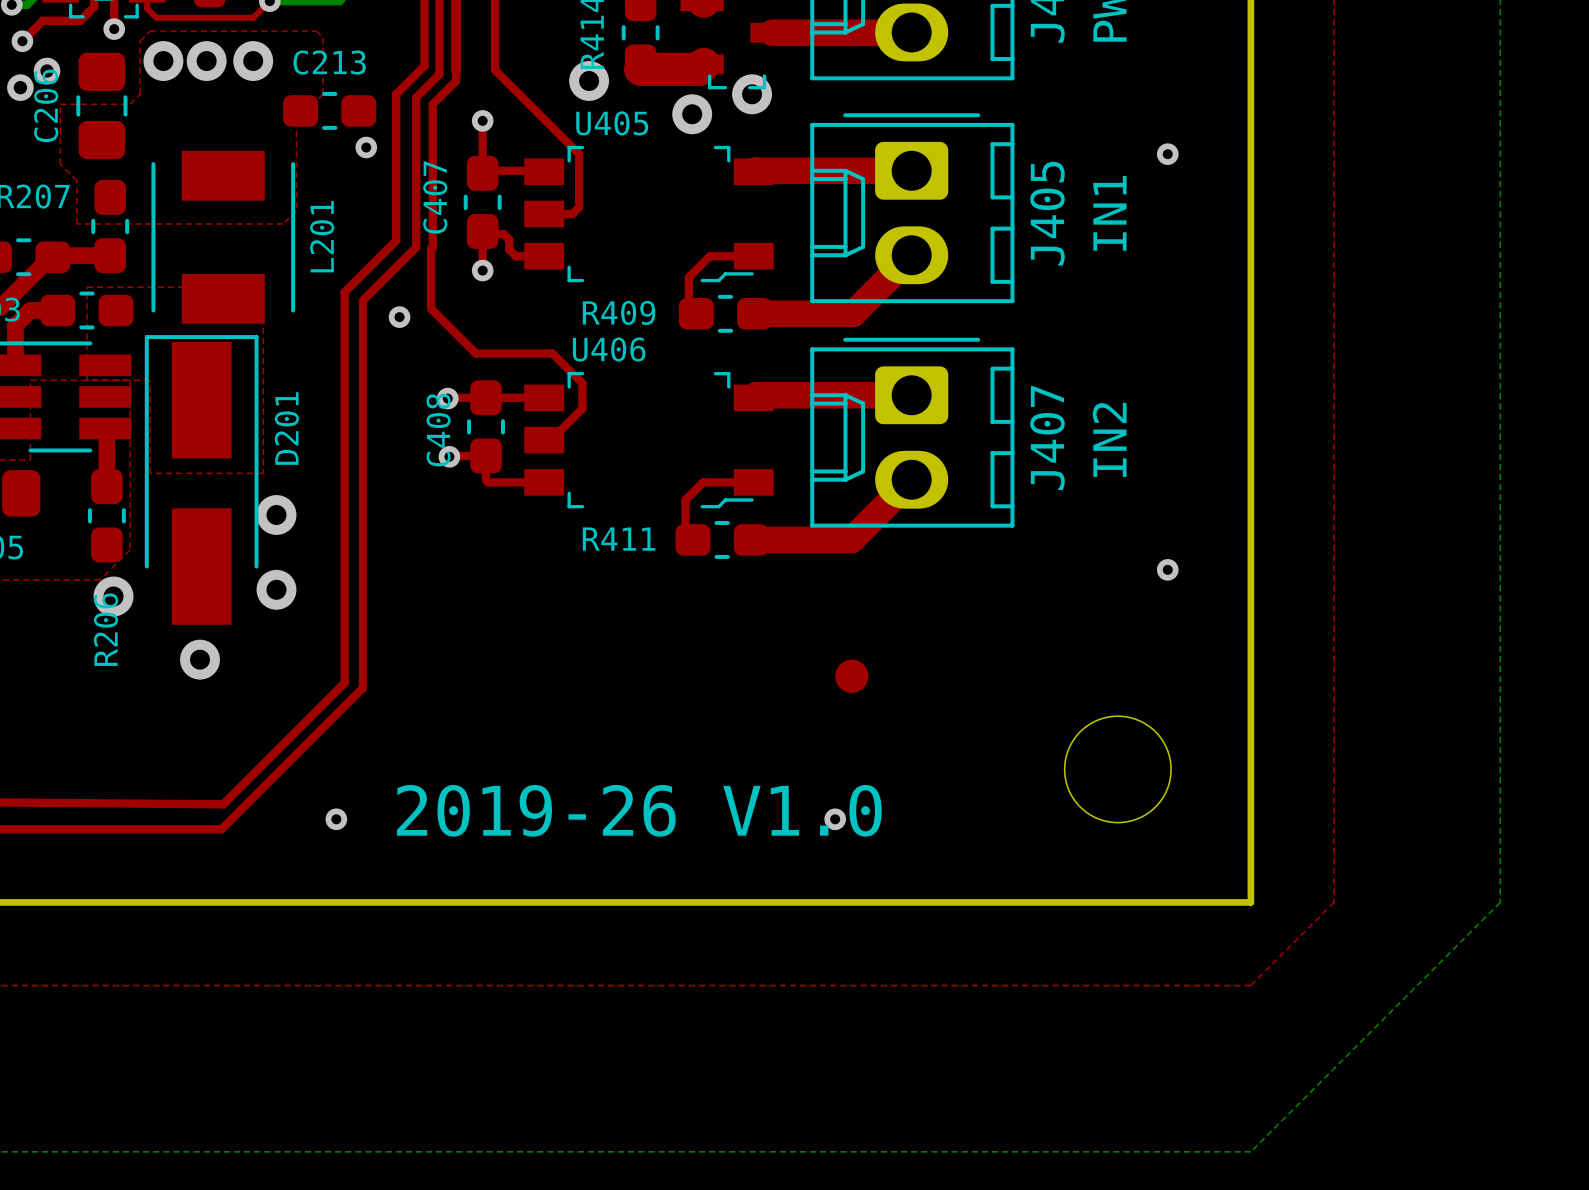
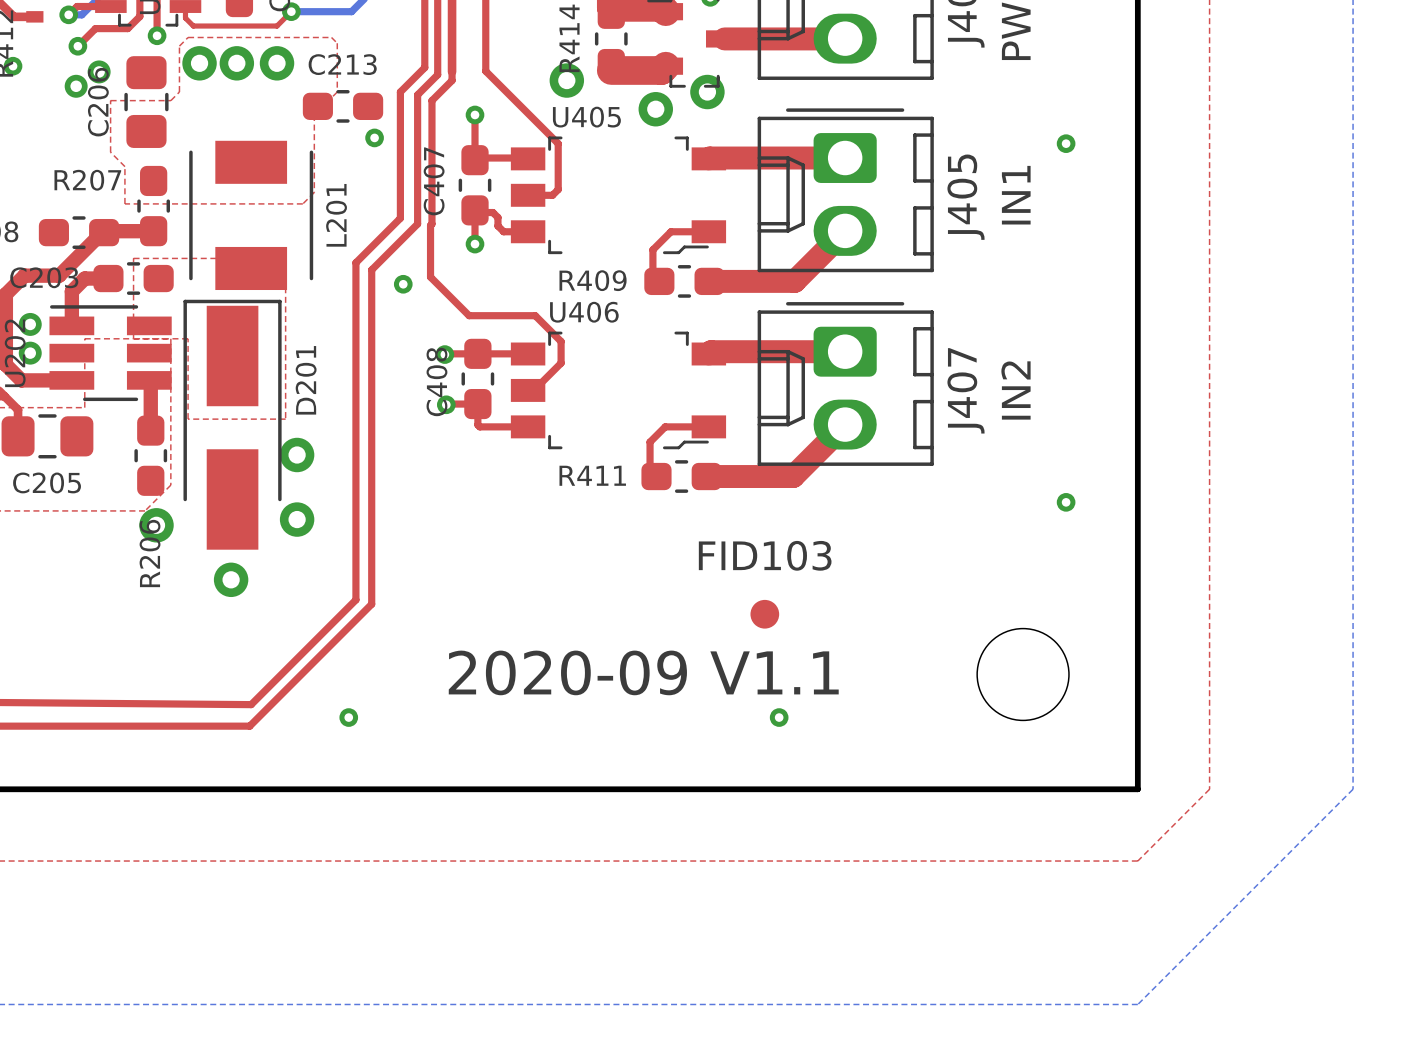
part: (851, 676) -> none
FID103: none -> (764, 614)
text: none -> 2020-09 V1.1 (643, 672)
text: 2019-26 V1.0 (639, 810) -> none

